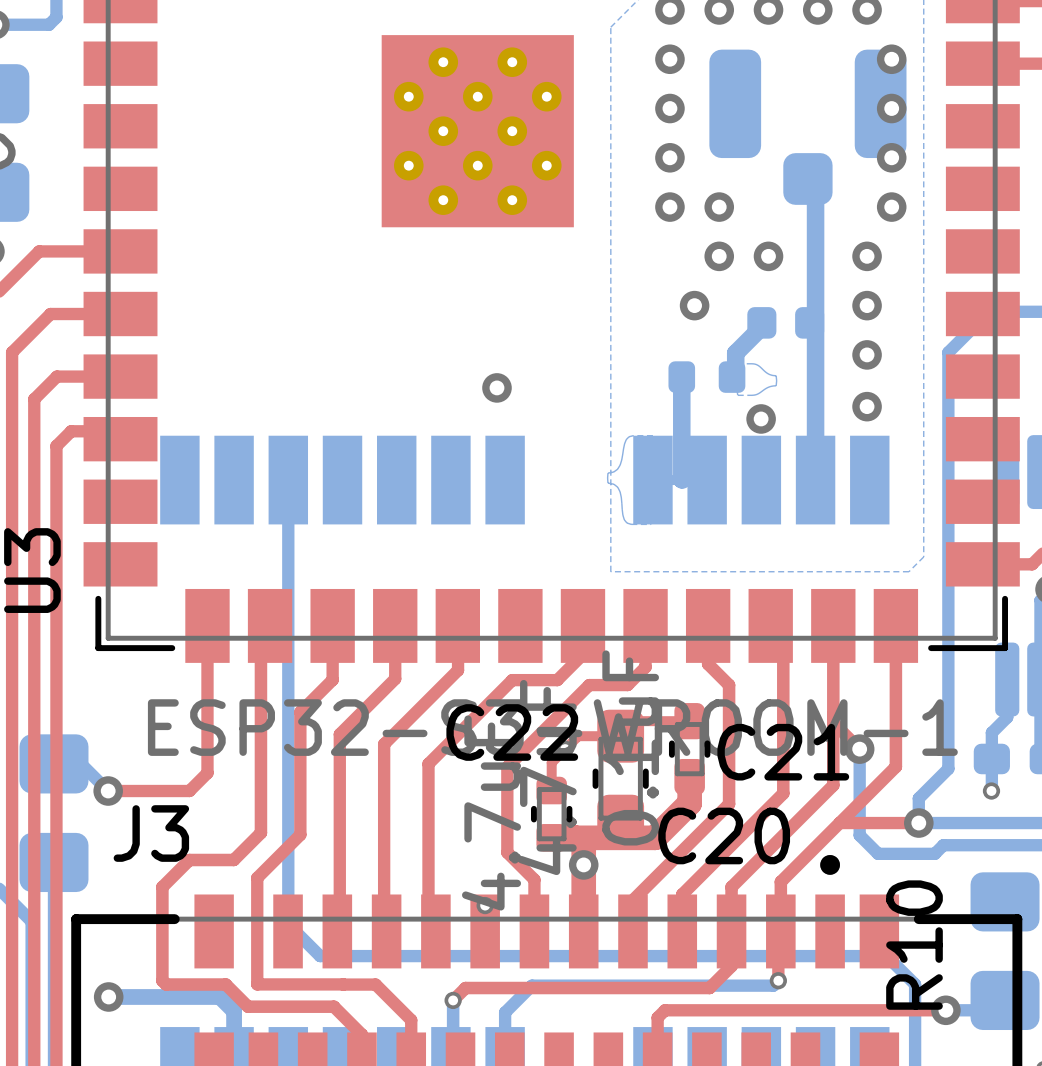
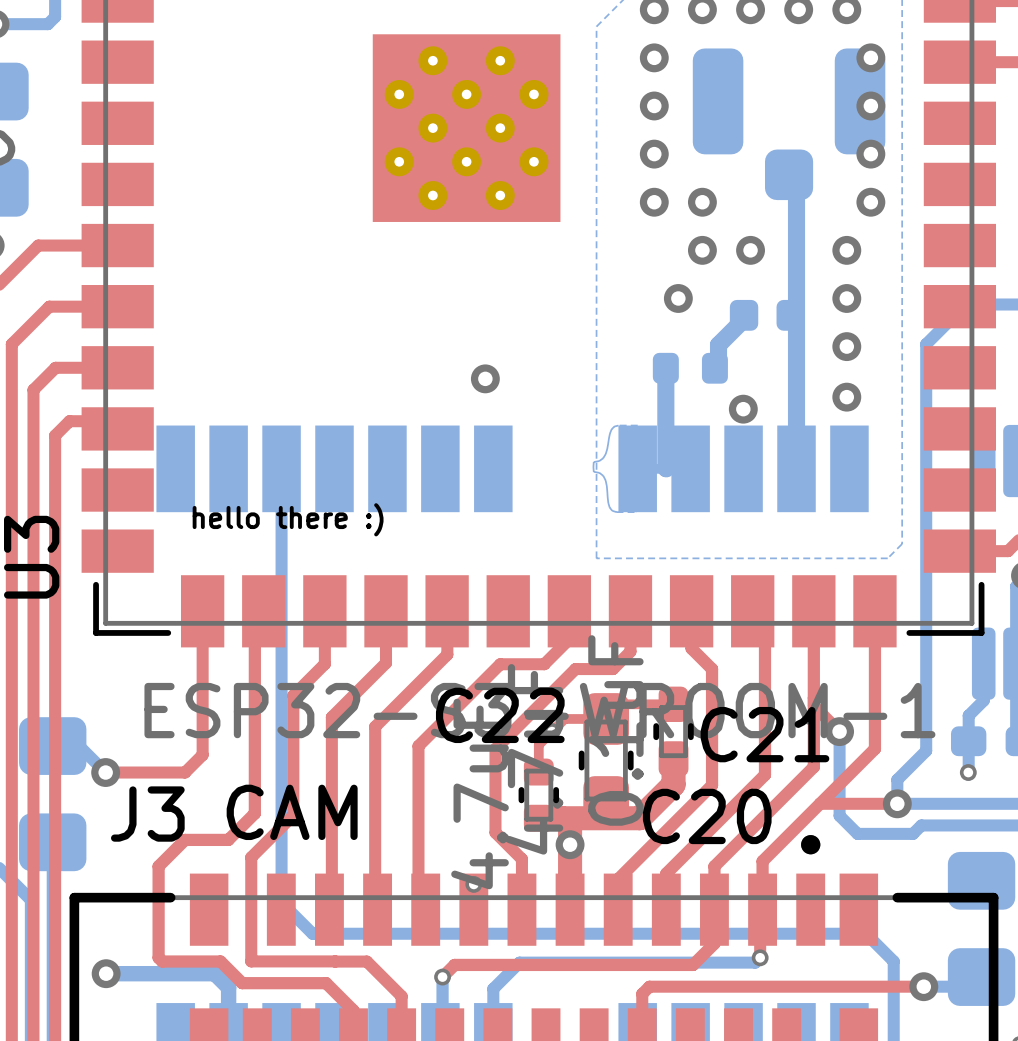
bottom zone outline: (738, 363) (755, 364) (767, 373) (776, 375) (776, 385) (767, 387) (754, 395) (737, 395) (735, 379) (738, 363) -> none
text: none -> hello there :) (288, 519)
text: none -> CAM (292, 812)
R10 name: R10 (914, 945) -> none

